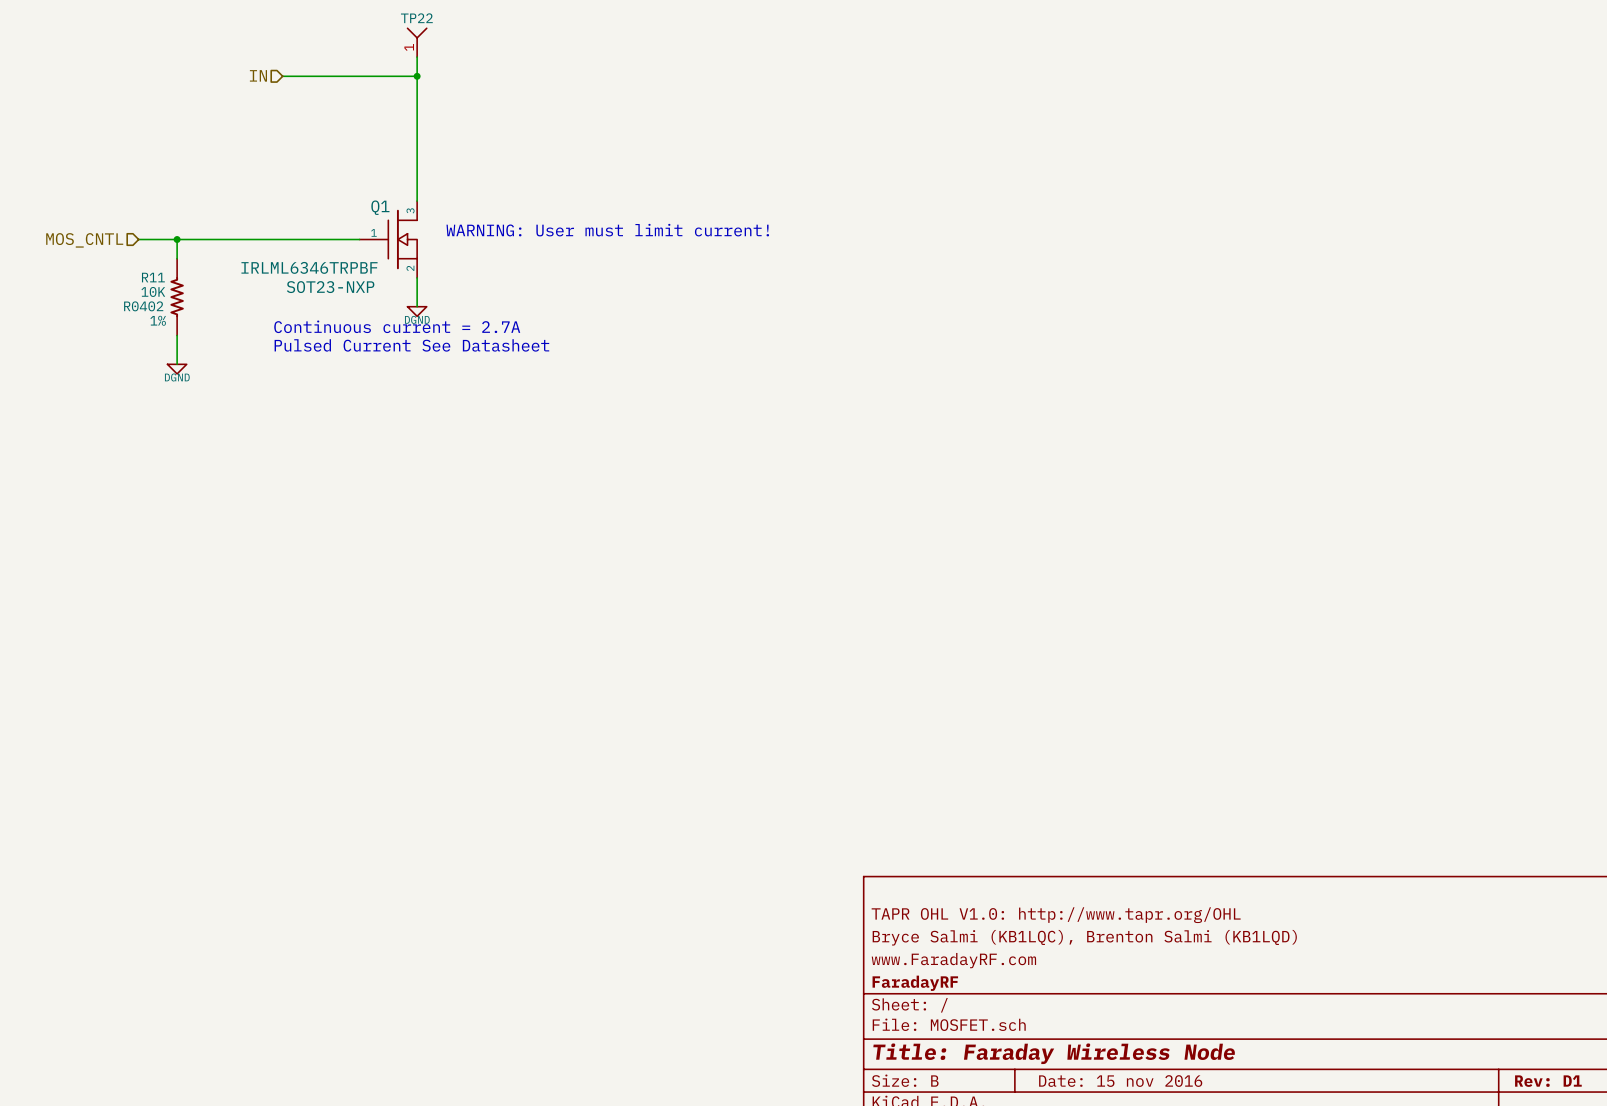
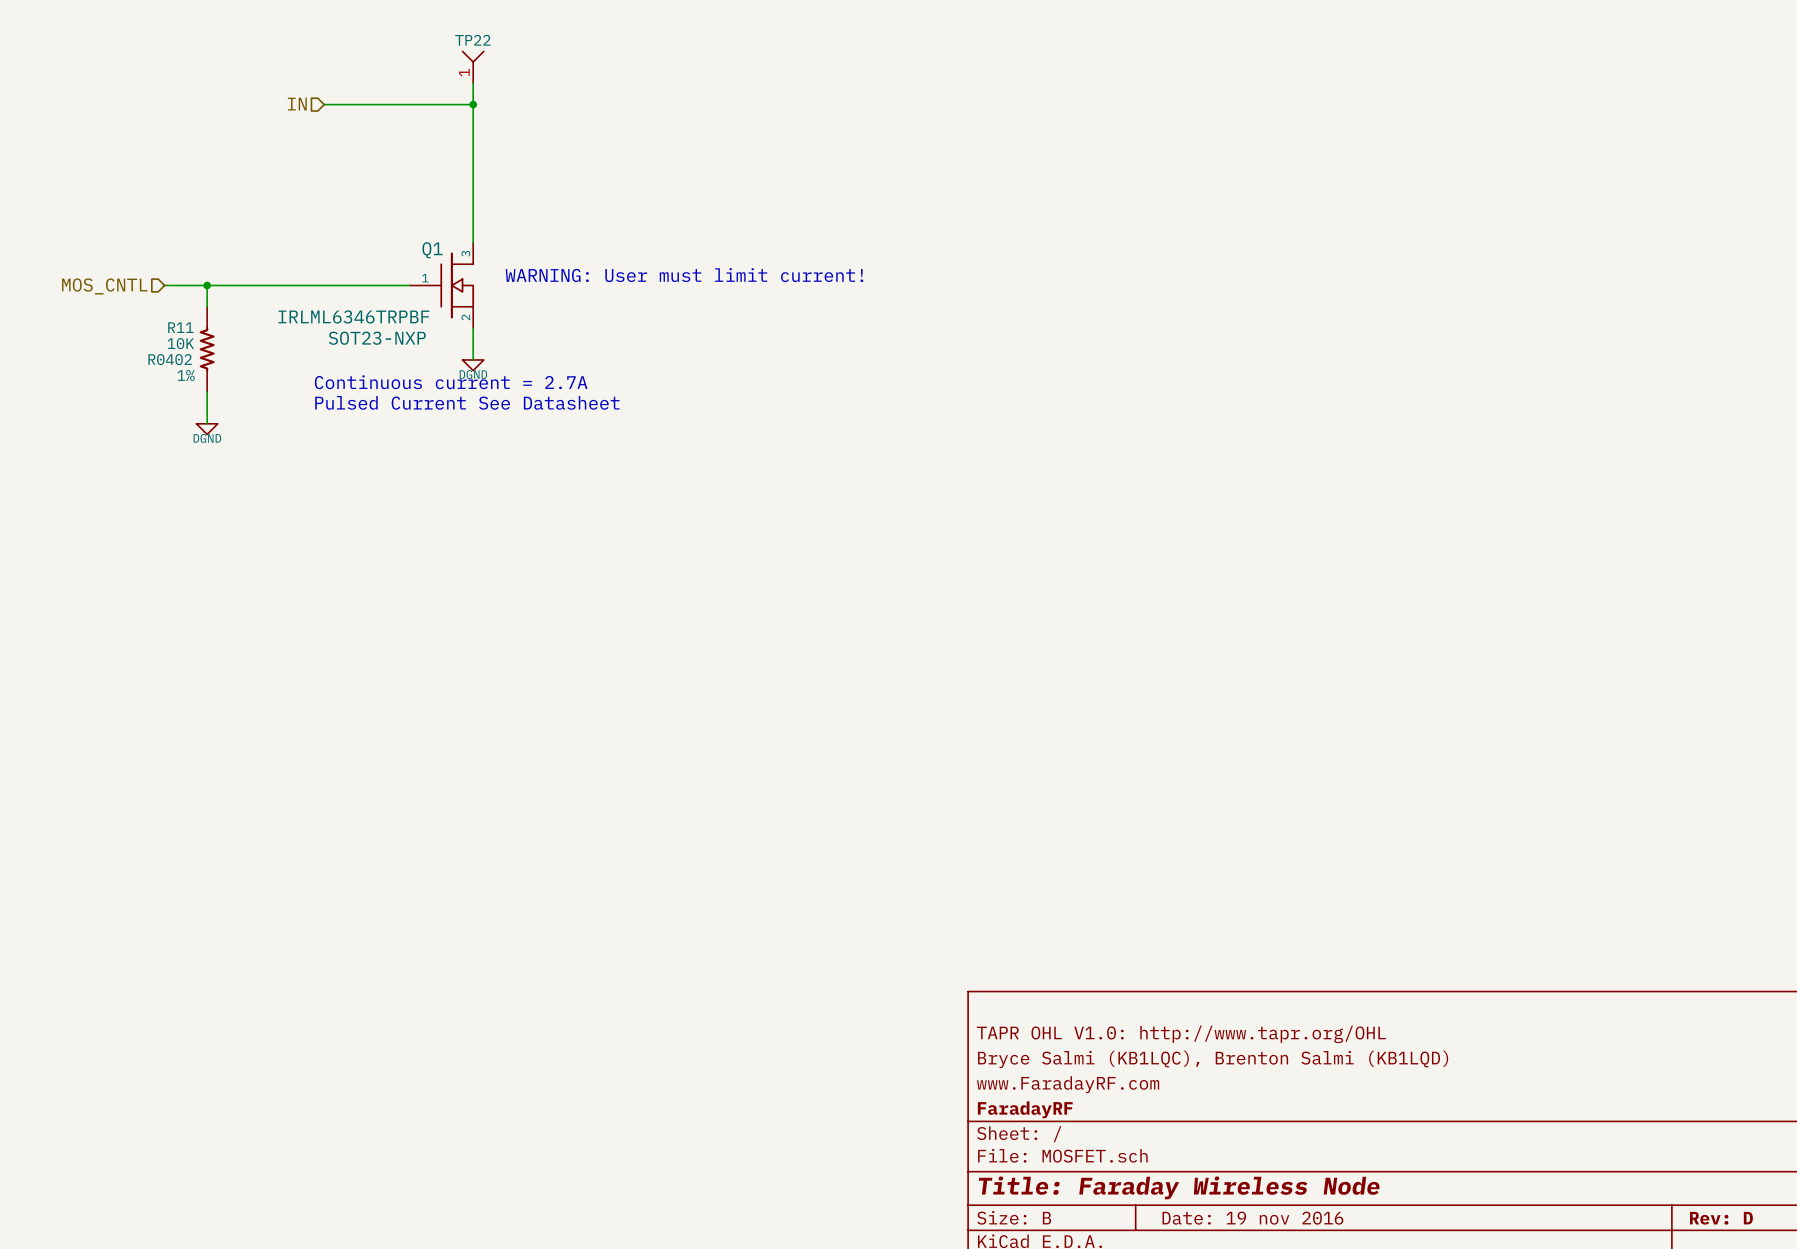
title block: Date: 15 nov 2016 (1120, 1081) -> Date: 19 nov 2016 (1252, 1218)
title block: Rev: D1 (1548, 1081) -> Rev: D (1721, 1218)

